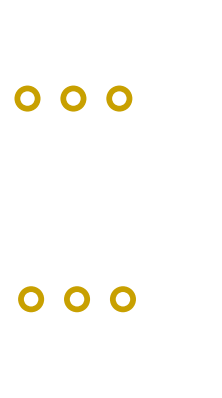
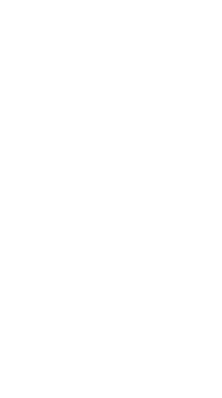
part: (73, 98) -> none
part: (77, 299) -> none

